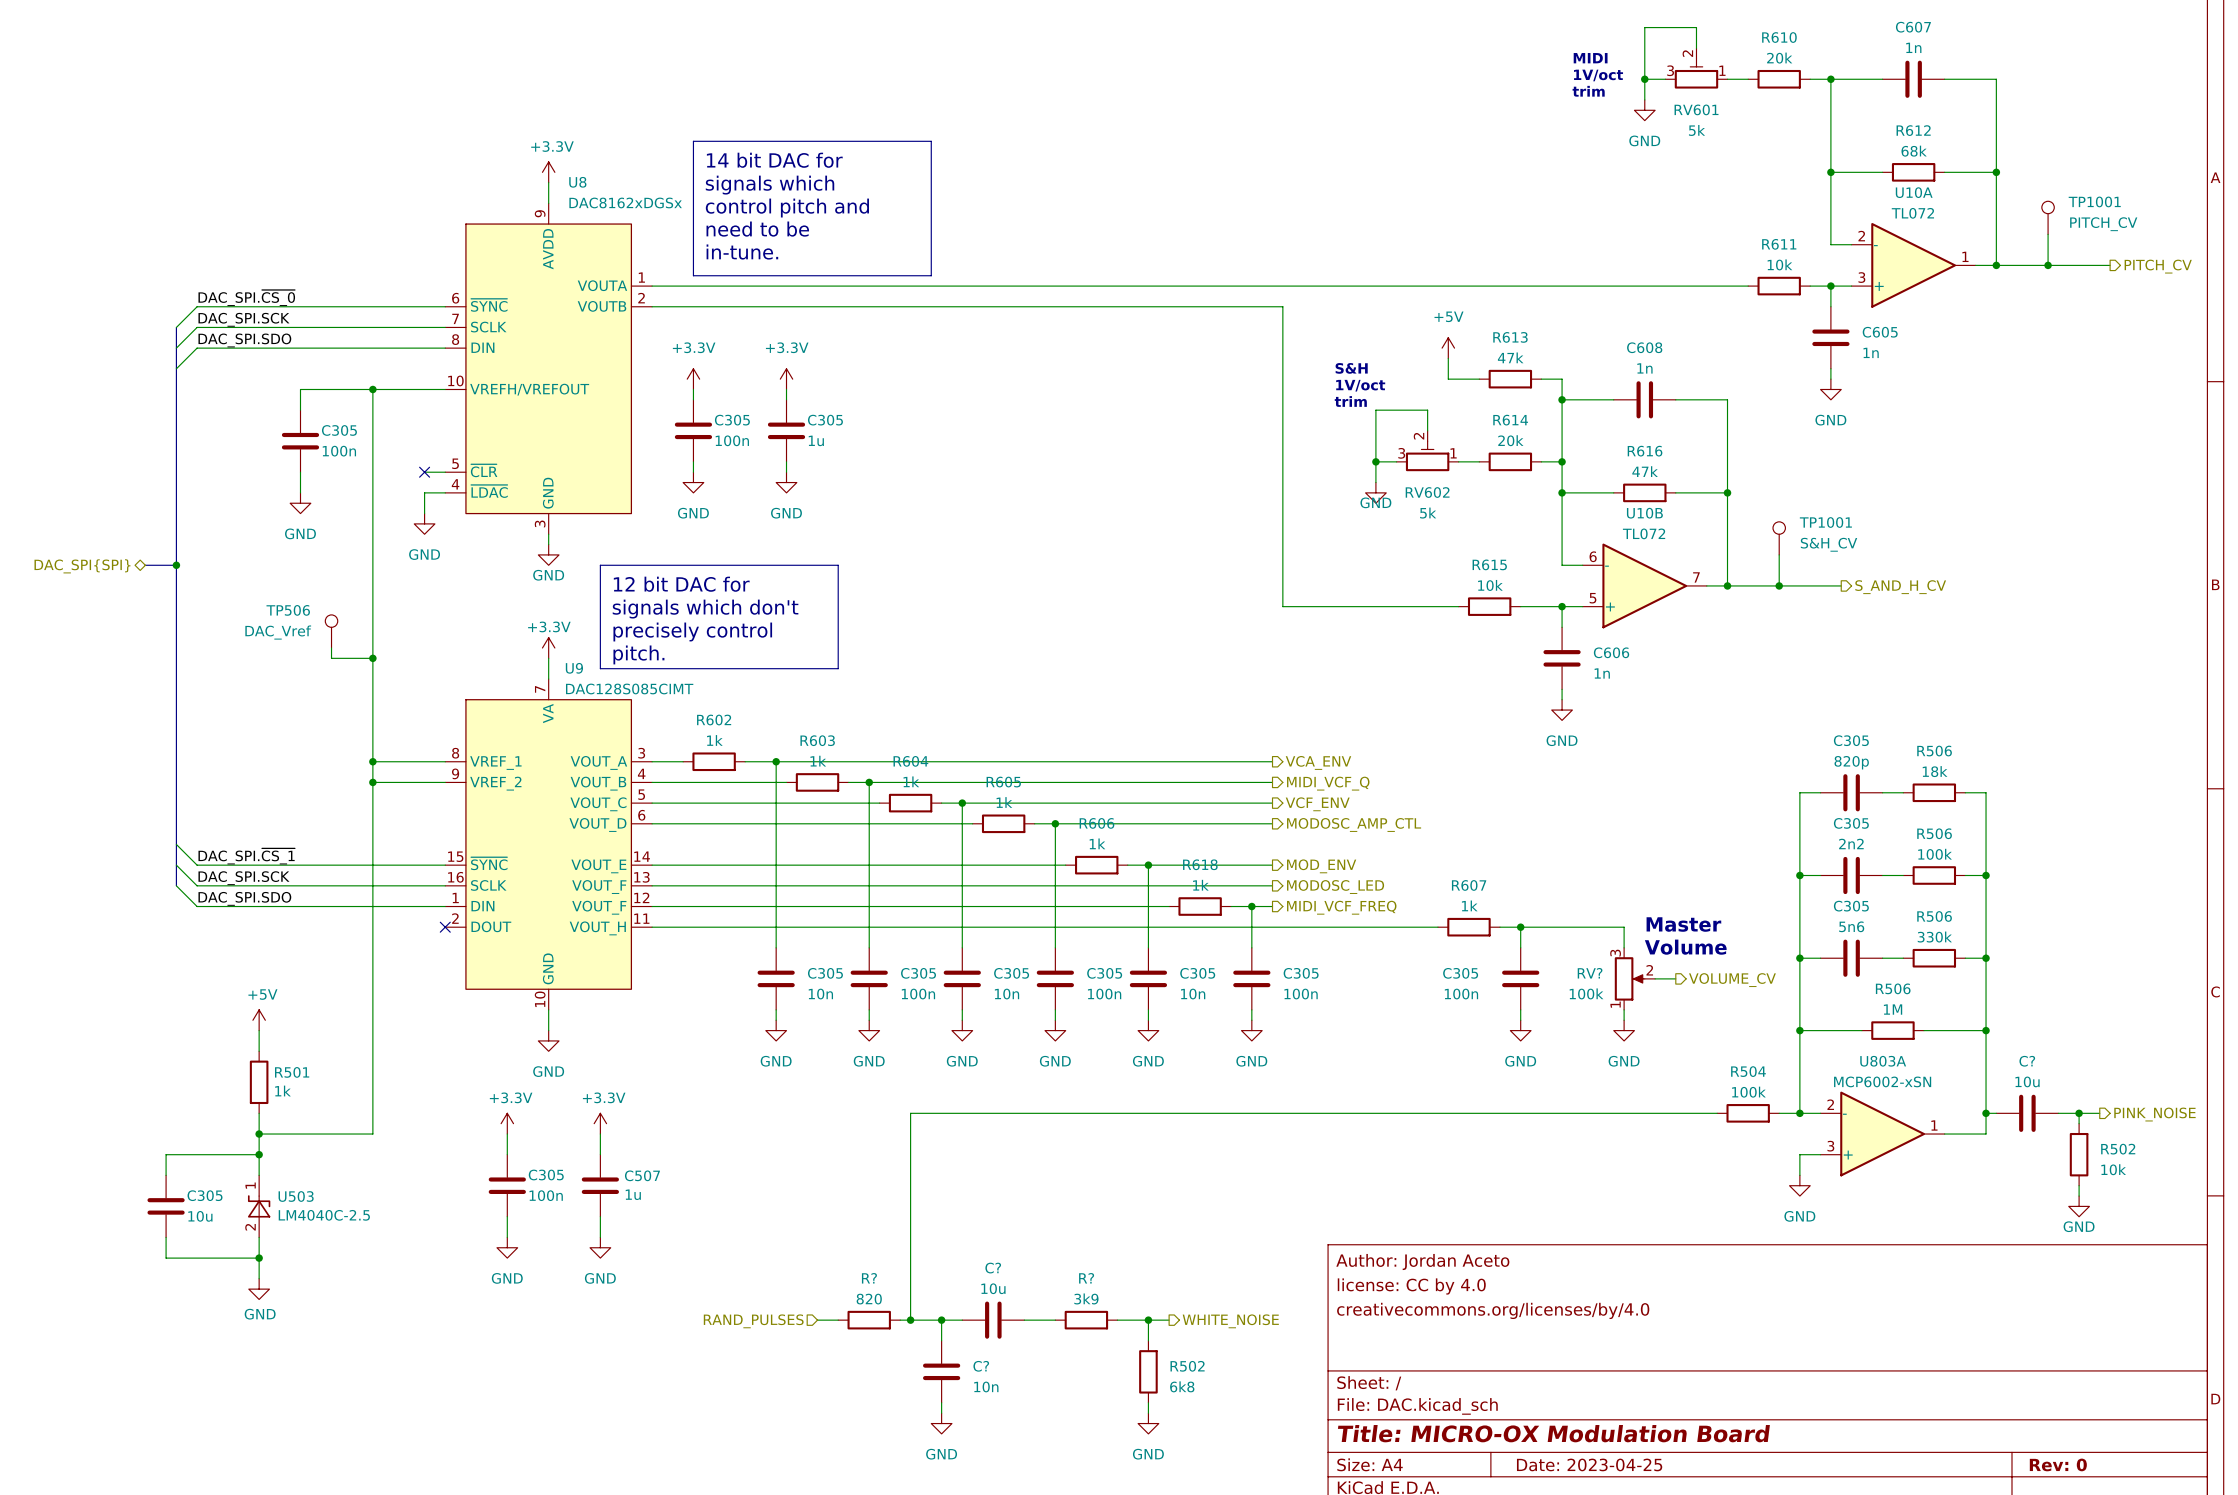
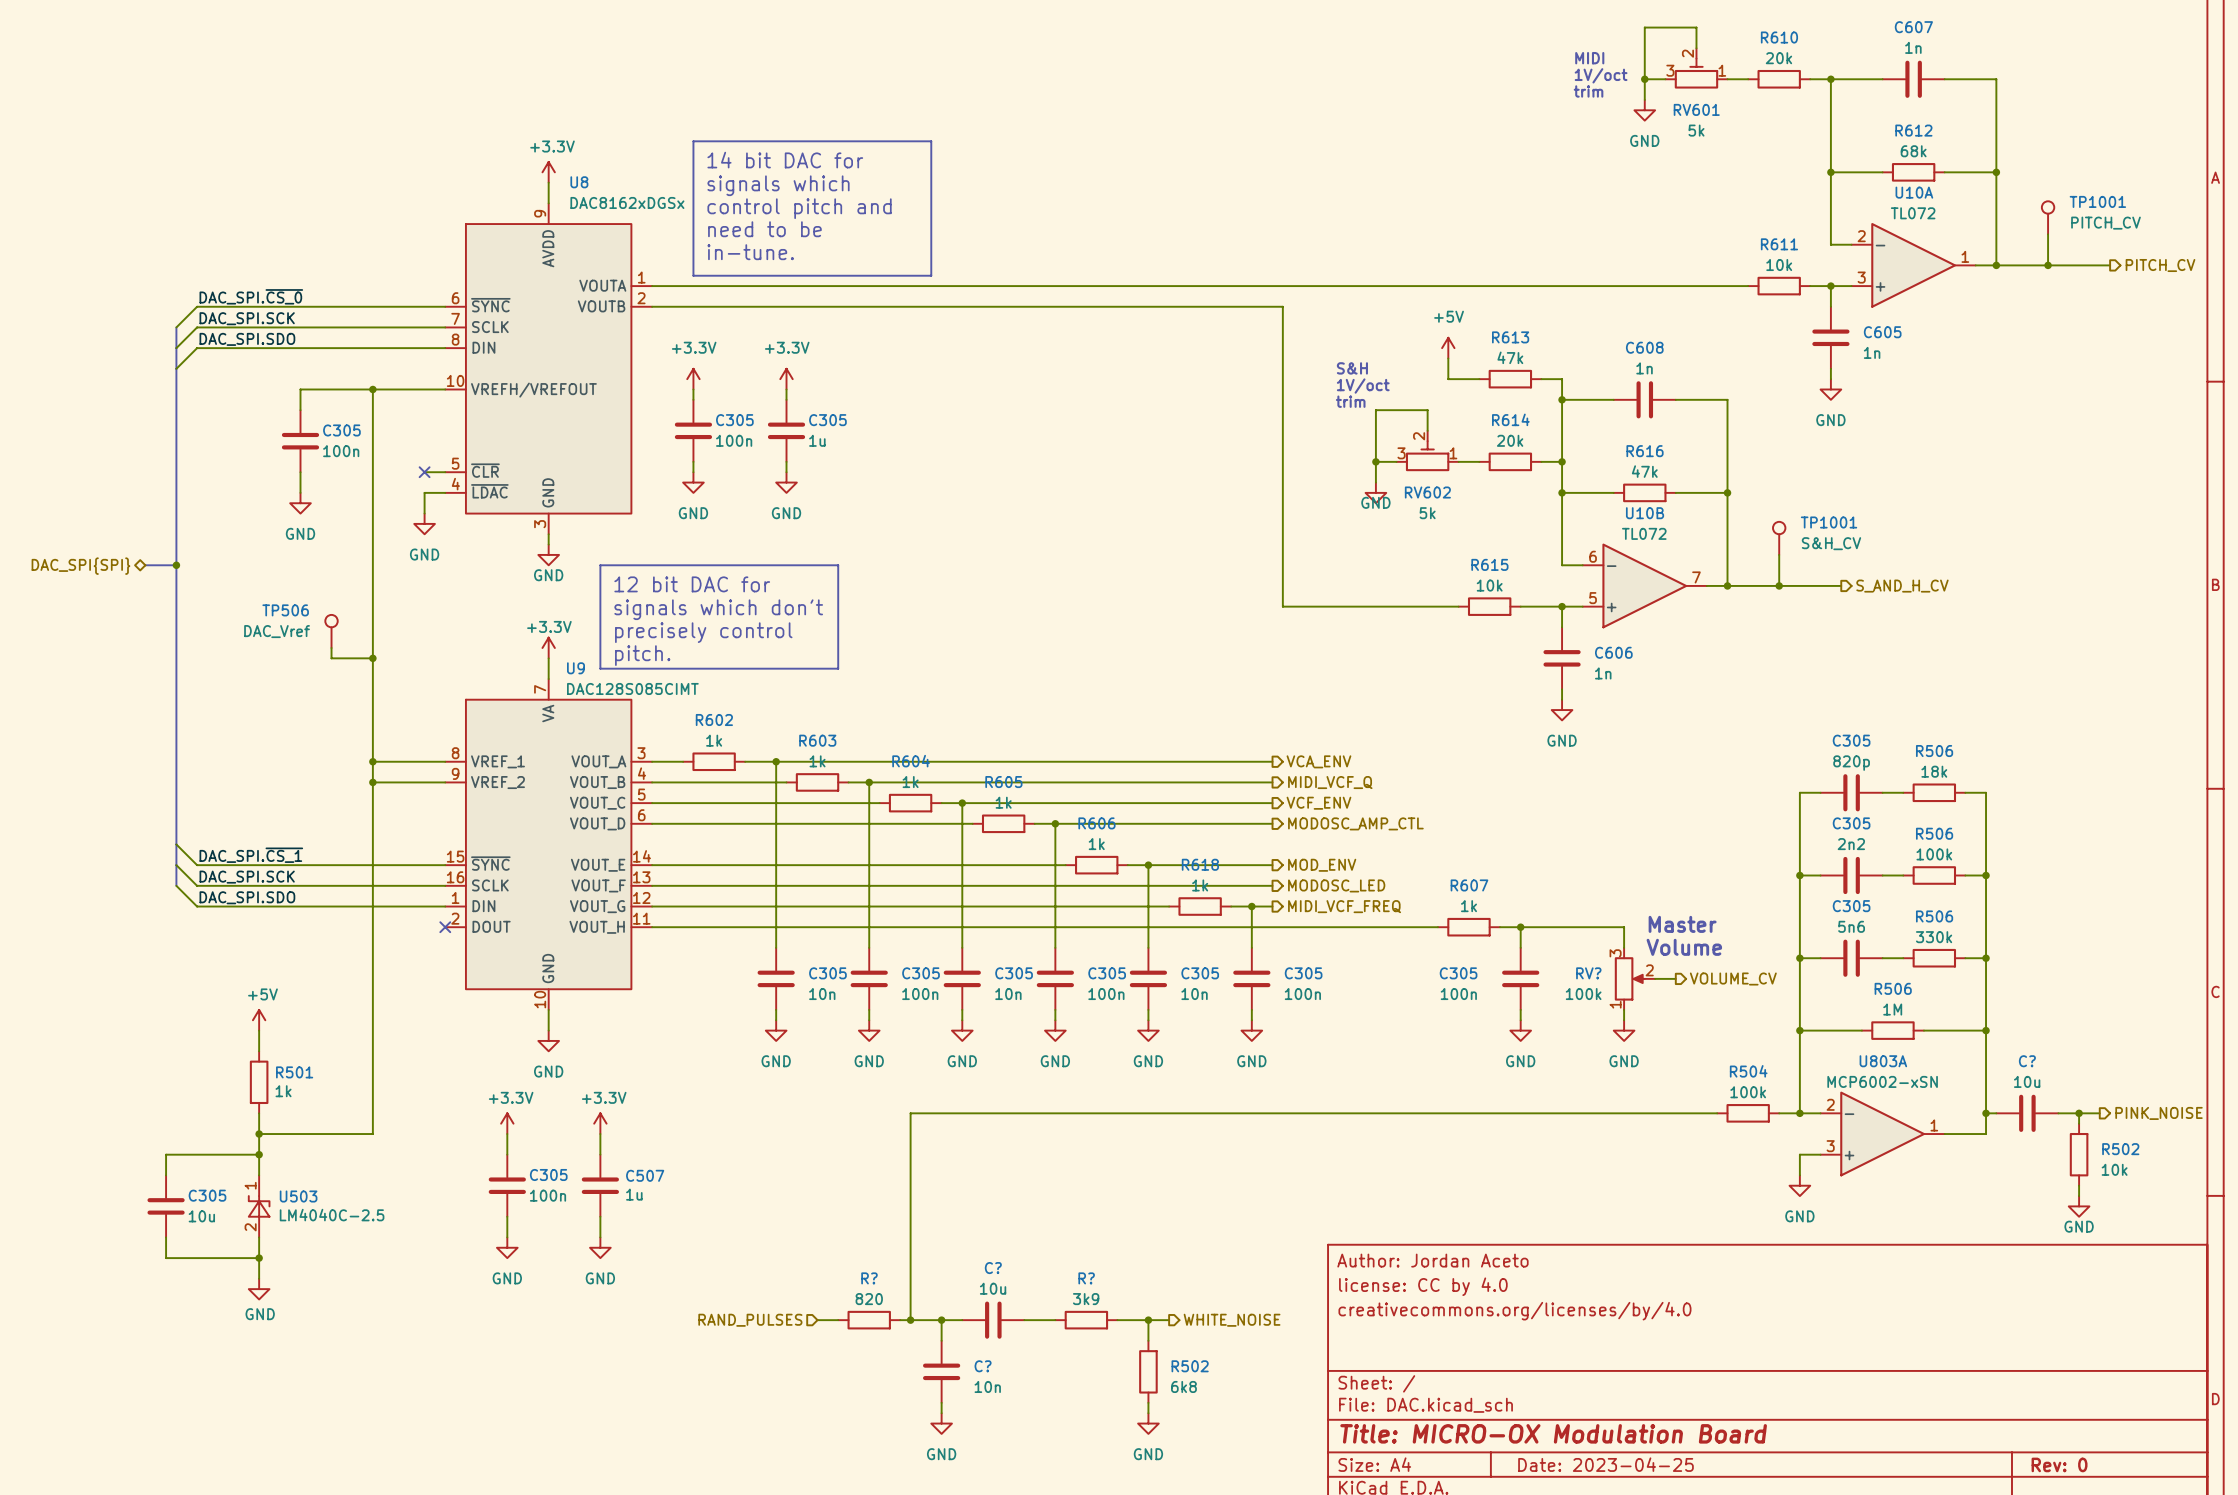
U9 pin name: VOUT_F (599, 907) -> VOUT_G (597, 906)

